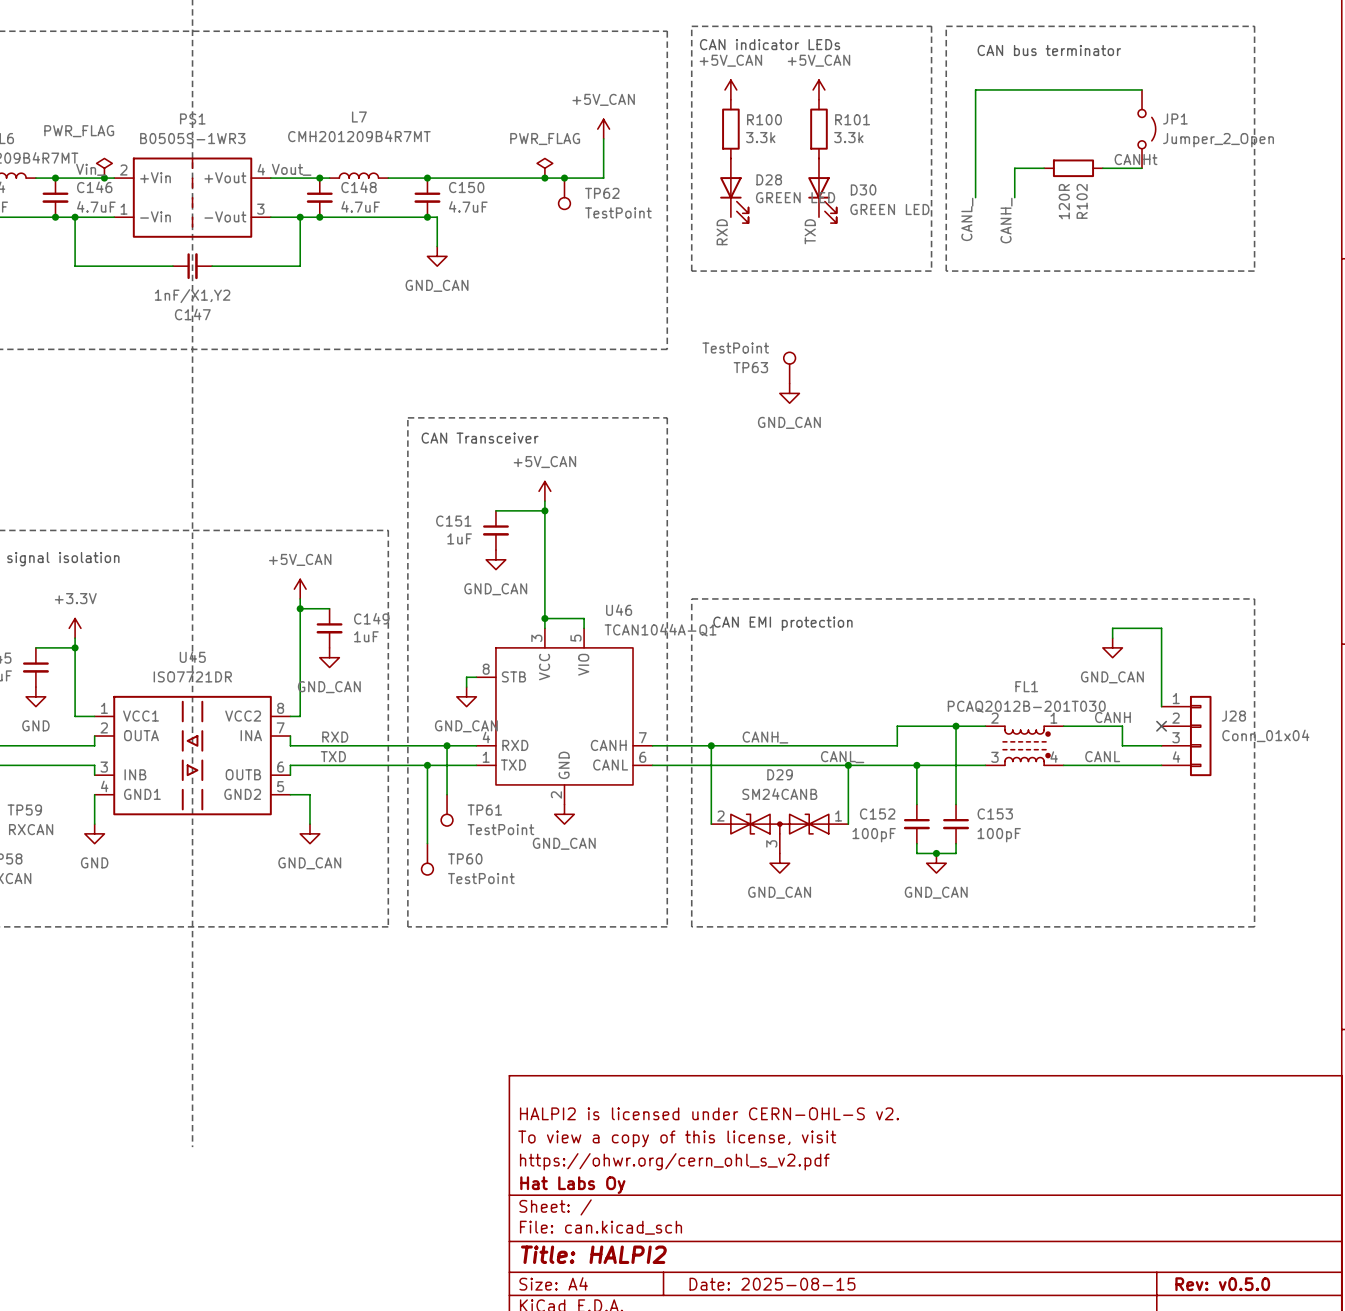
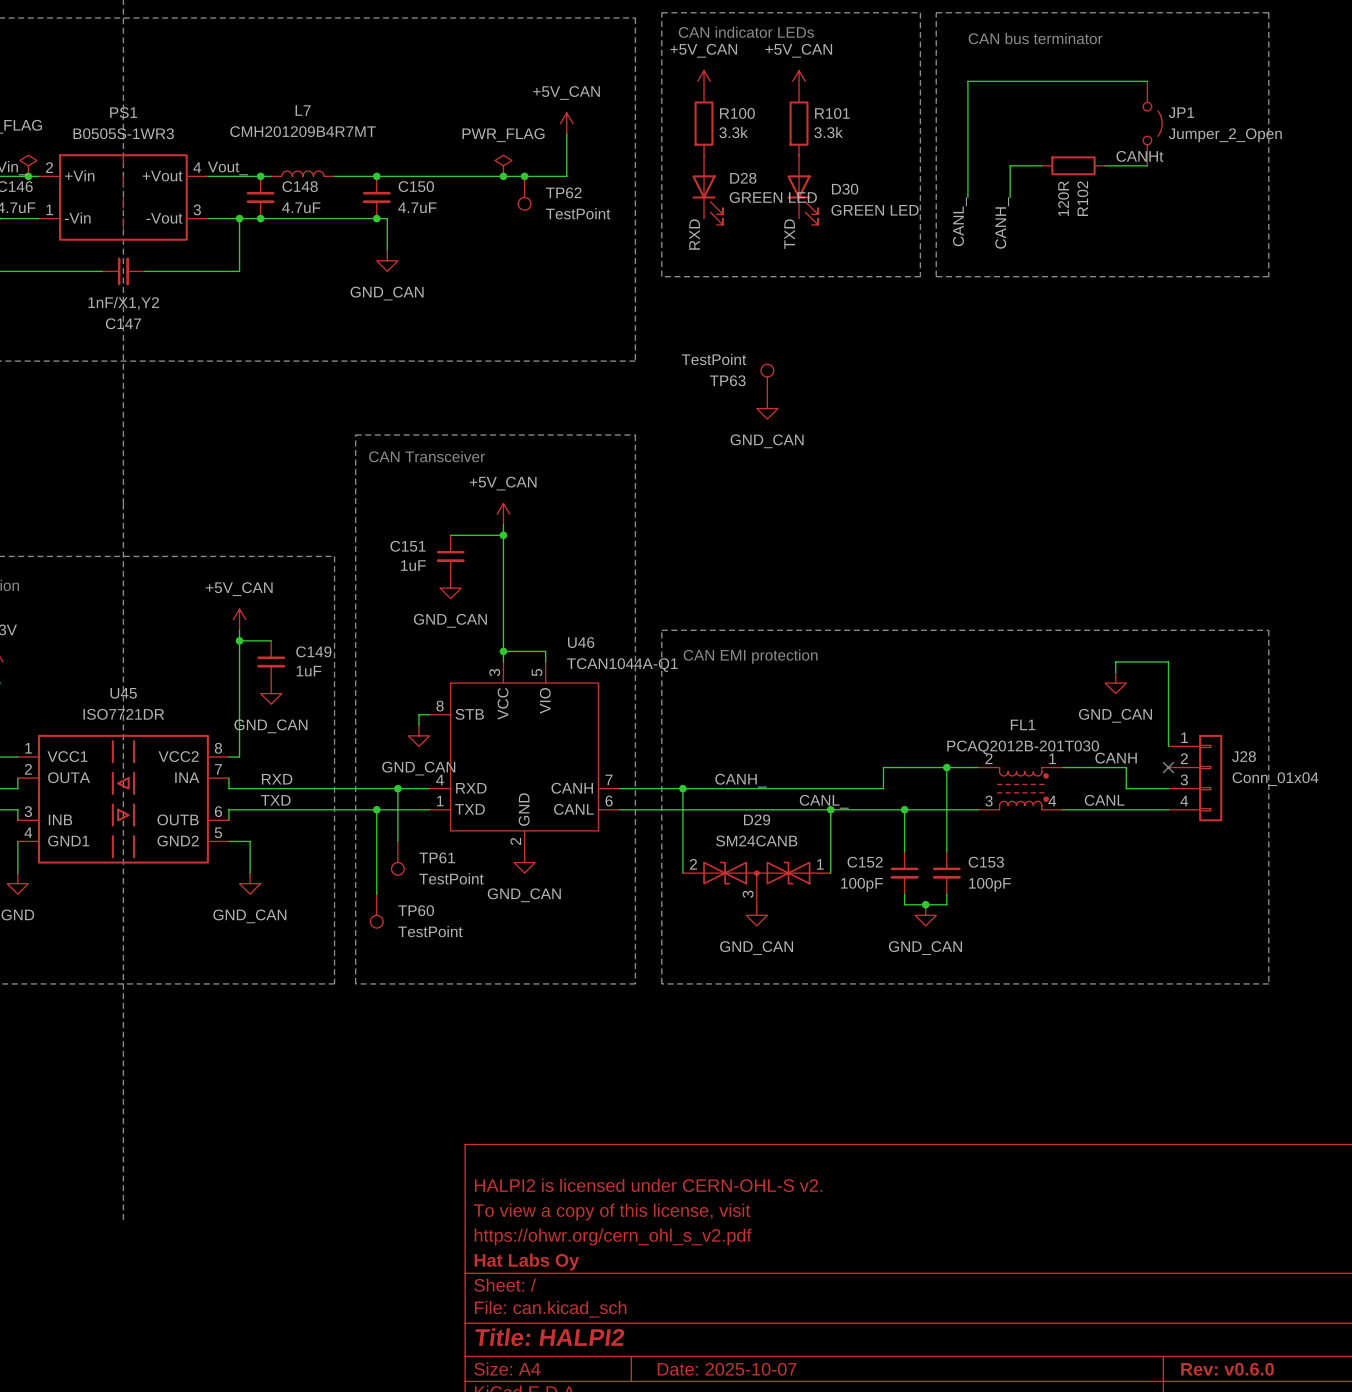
title block: Date: 2025-08-15 (772, 1284) -> Date: 2025-10-07 (727, 1369)
title block: Rev: v0.5.0 (1222, 1284) -> Rev: v0.6.0 (1227, 1369)

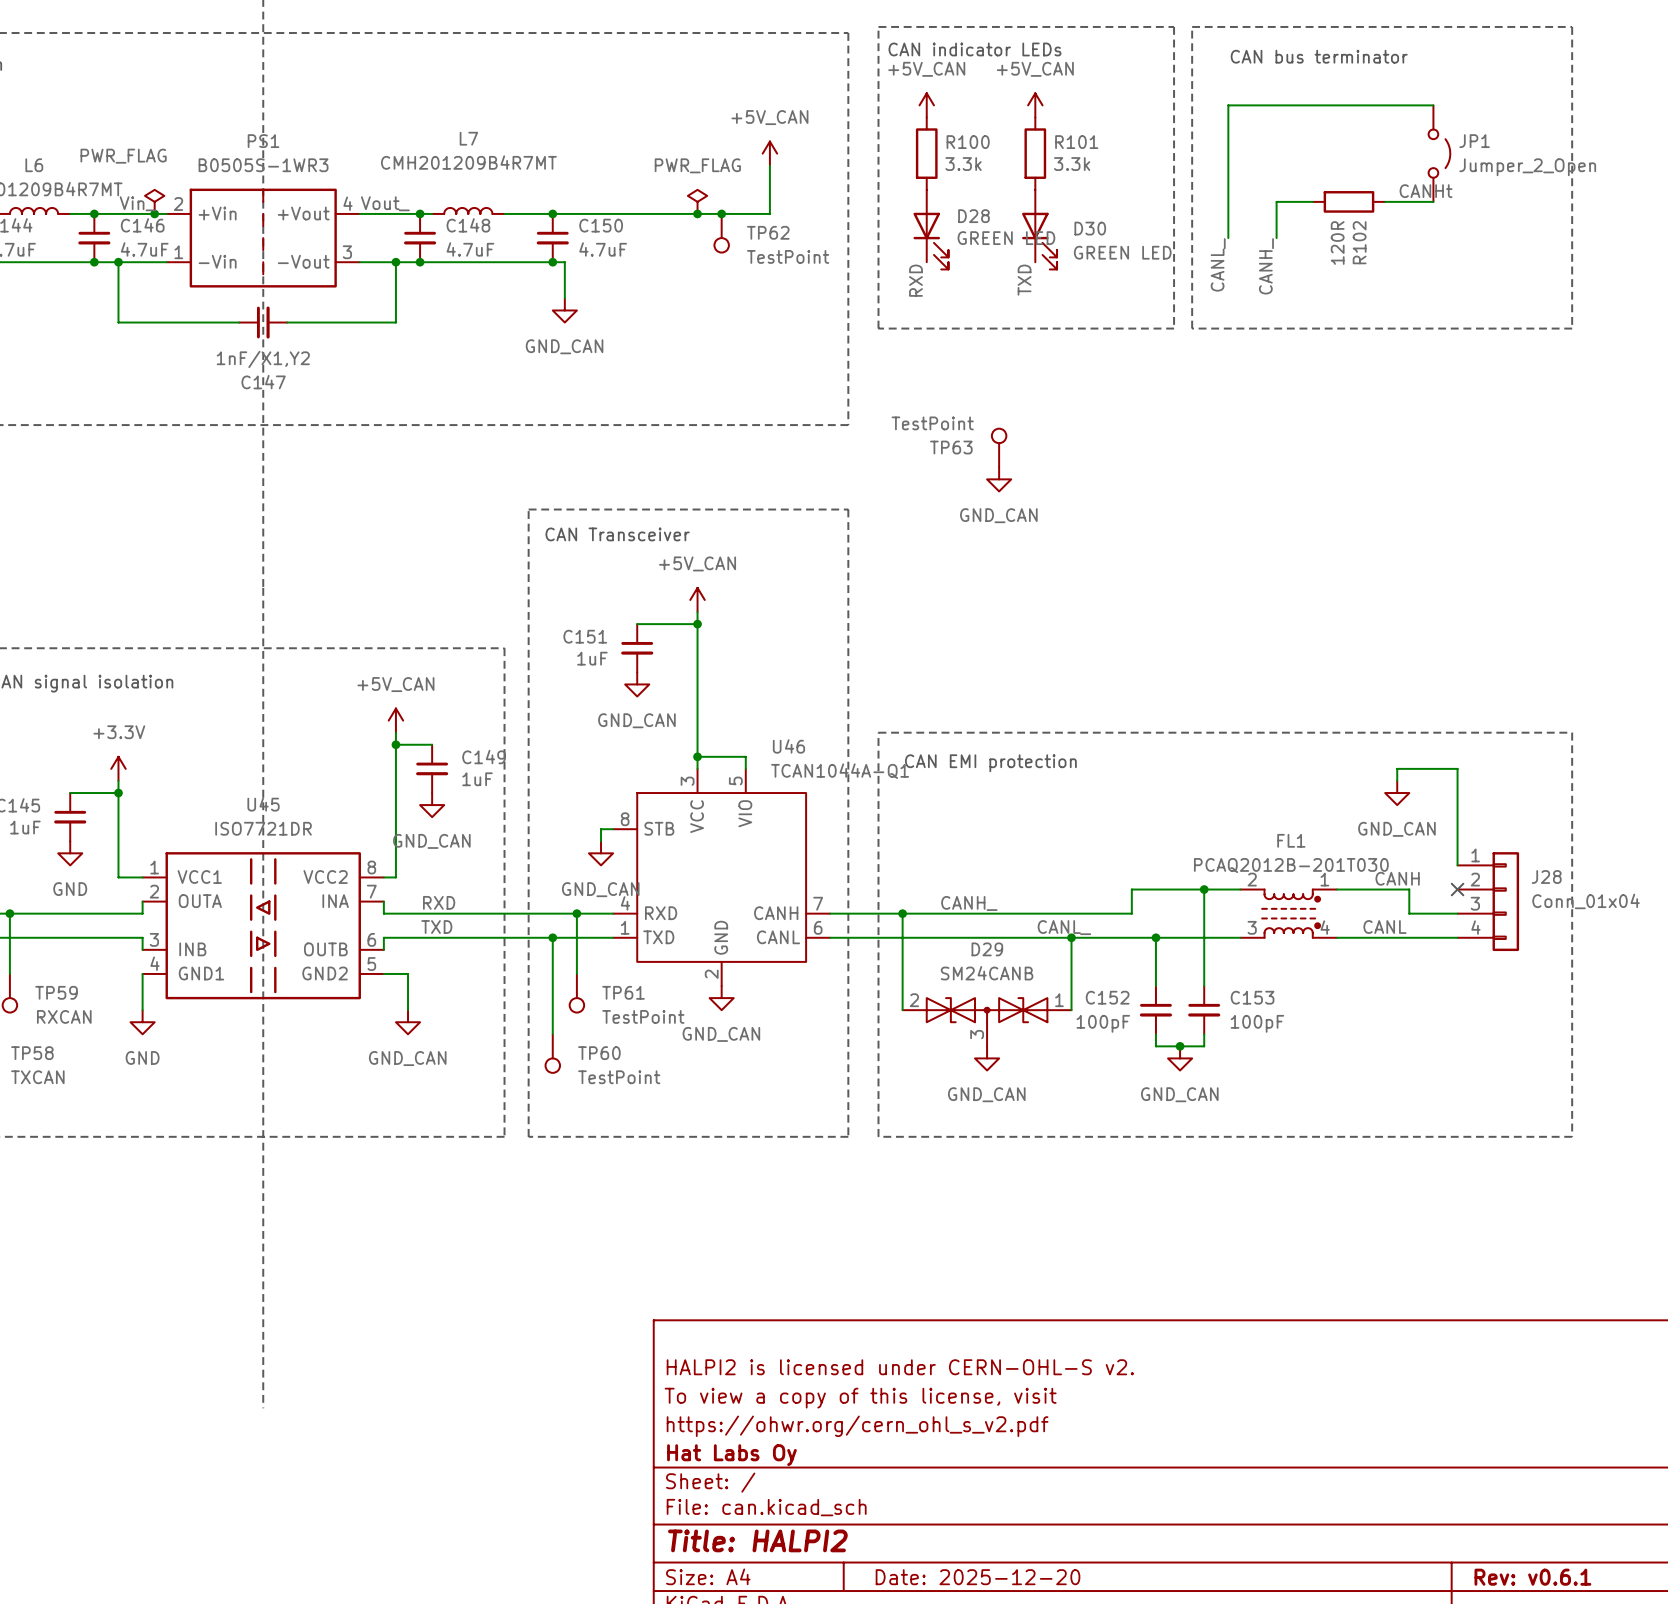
title block: Date: 2025-10-07 (727, 1369) -> Date: 2025-12-20 (978, 1577)
title block: Rev: v0.6.0 (1227, 1369) -> Rev: v0.6.1 (1532, 1577)

